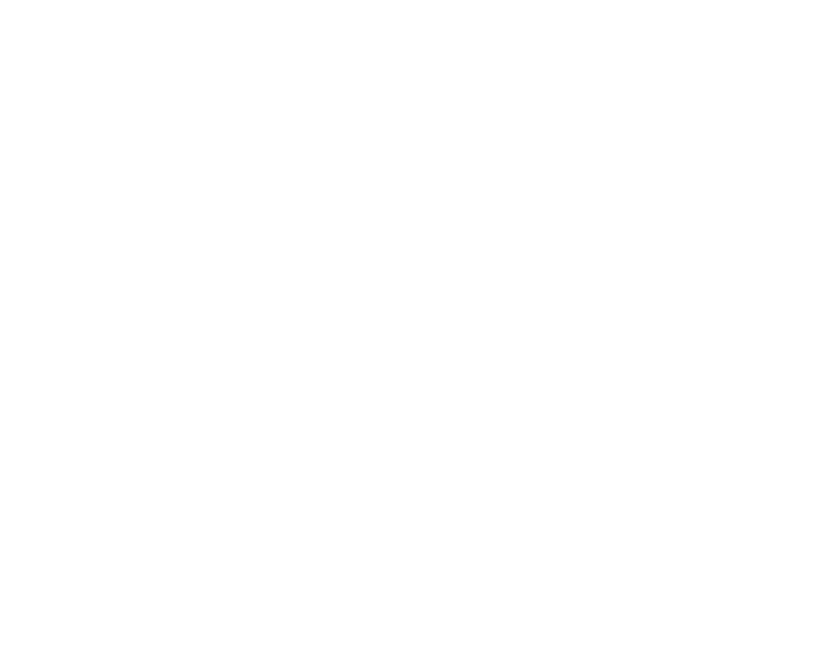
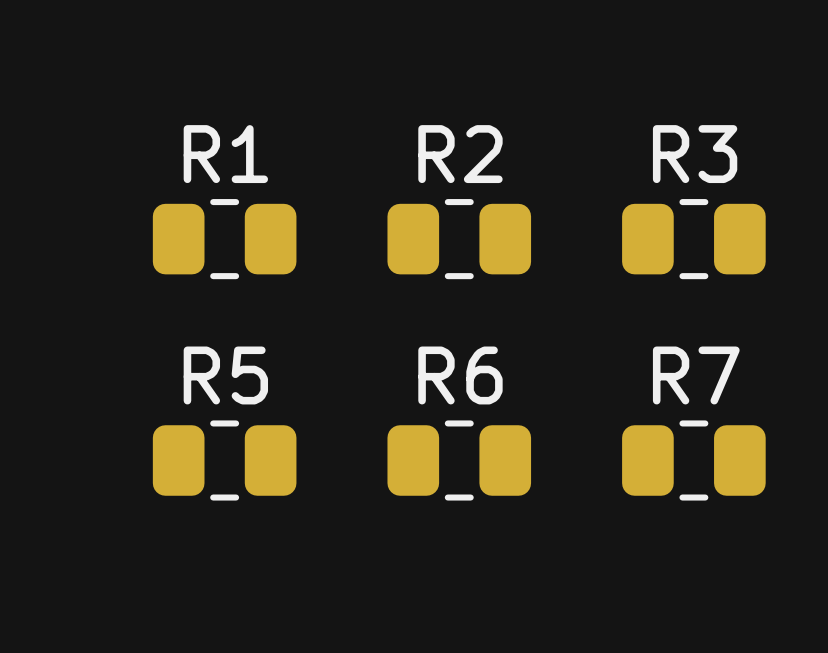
R1: none -> (224, 239)
R2: none -> (459, 239)
R3: none -> (693, 239)
R5: none -> (224, 460)
R6: none -> (459, 460)
R7: none -> (693, 460)

